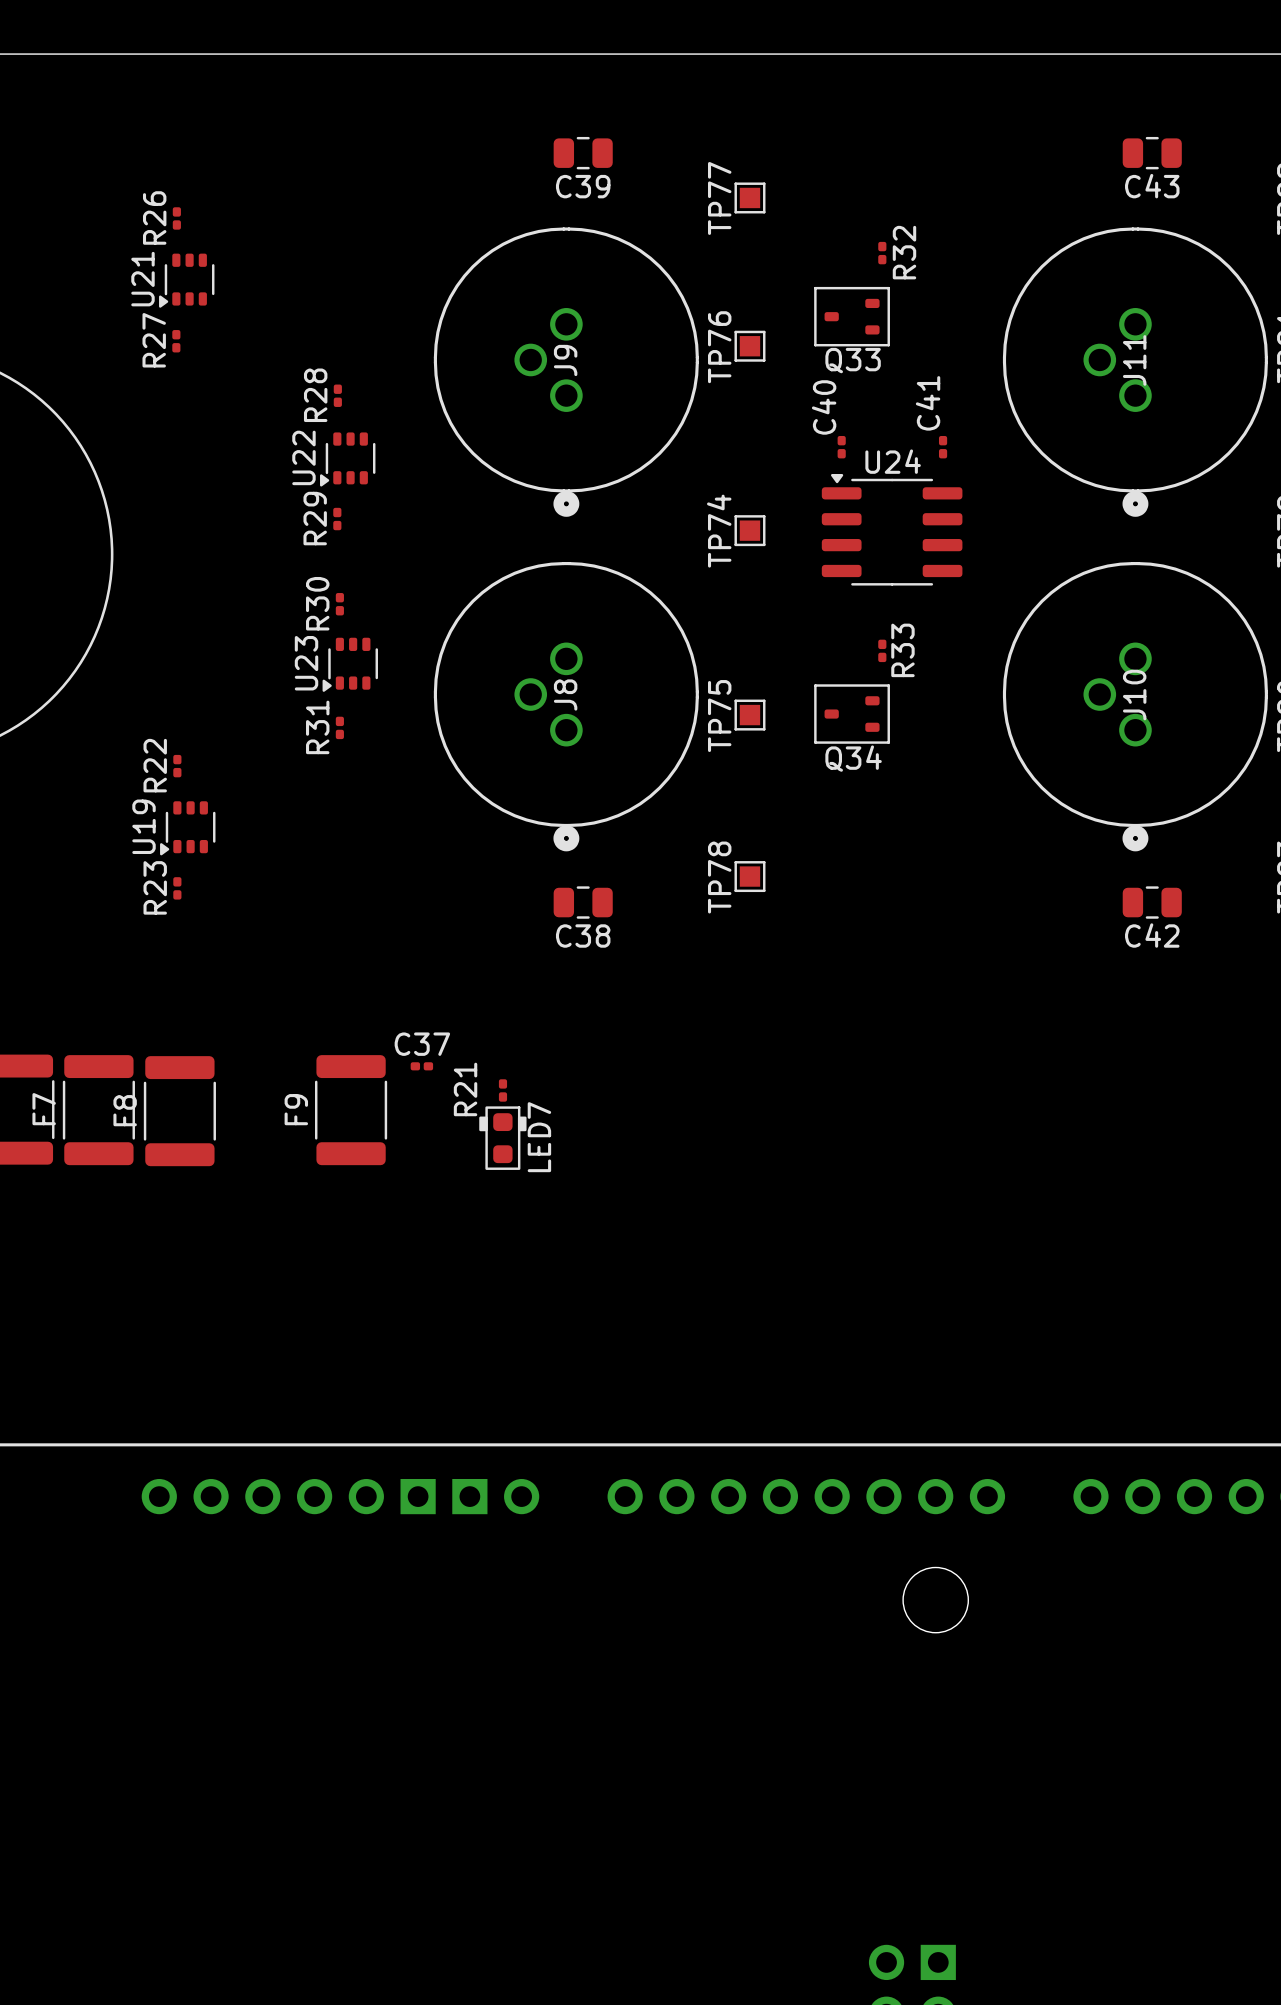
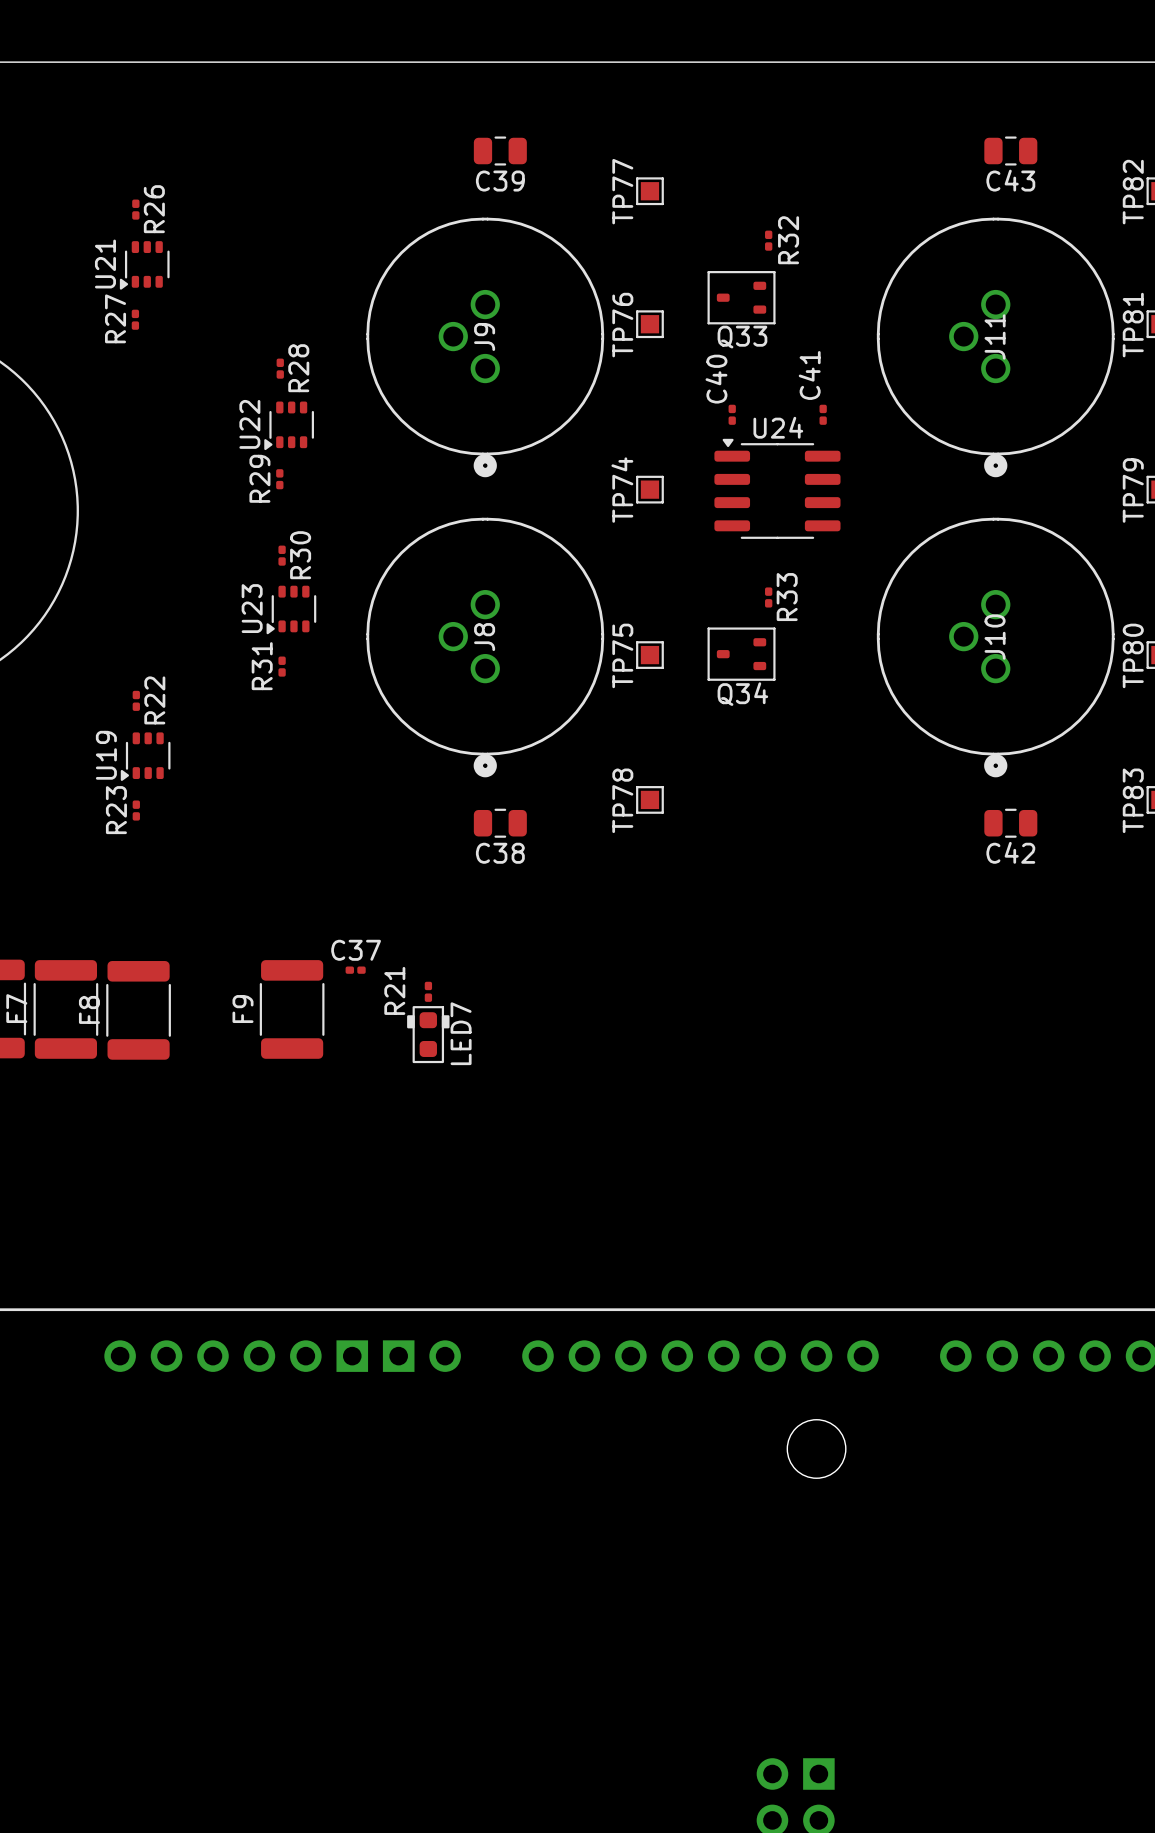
R26 name position: R26 (154, 217) -> R26 (154, 209)
R28 name position: R28 (315, 395) -> R28 (298, 368)
R30 name position: R30 (317, 603) -> R30 (300, 555)
R22 name position: R22 (155, 765) -> R22 (154, 700)

